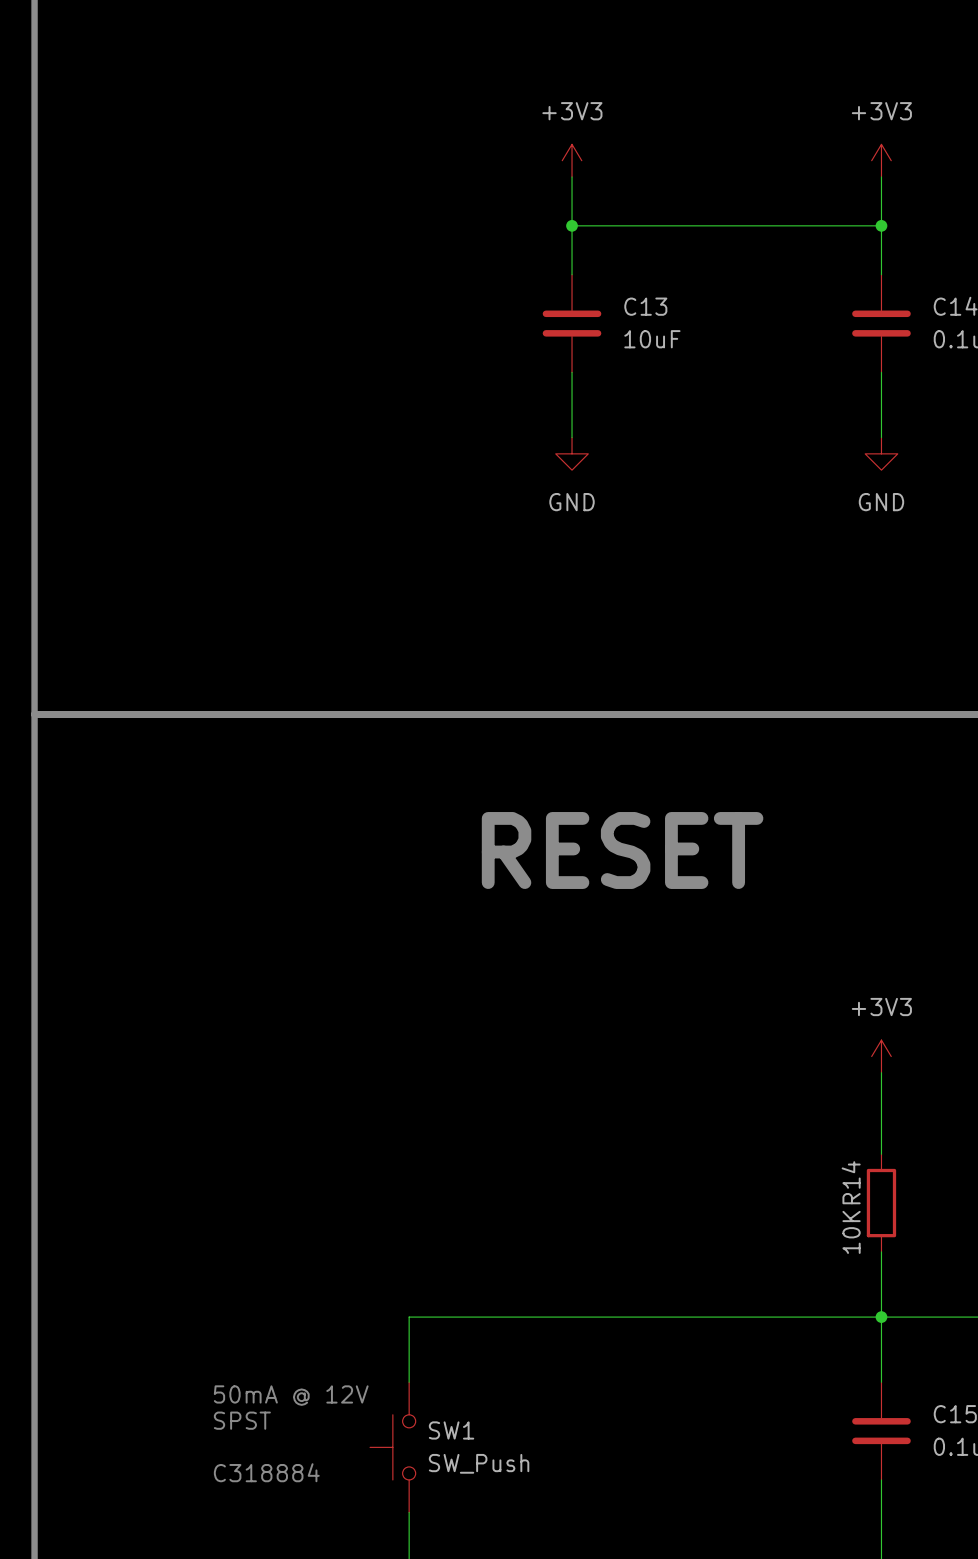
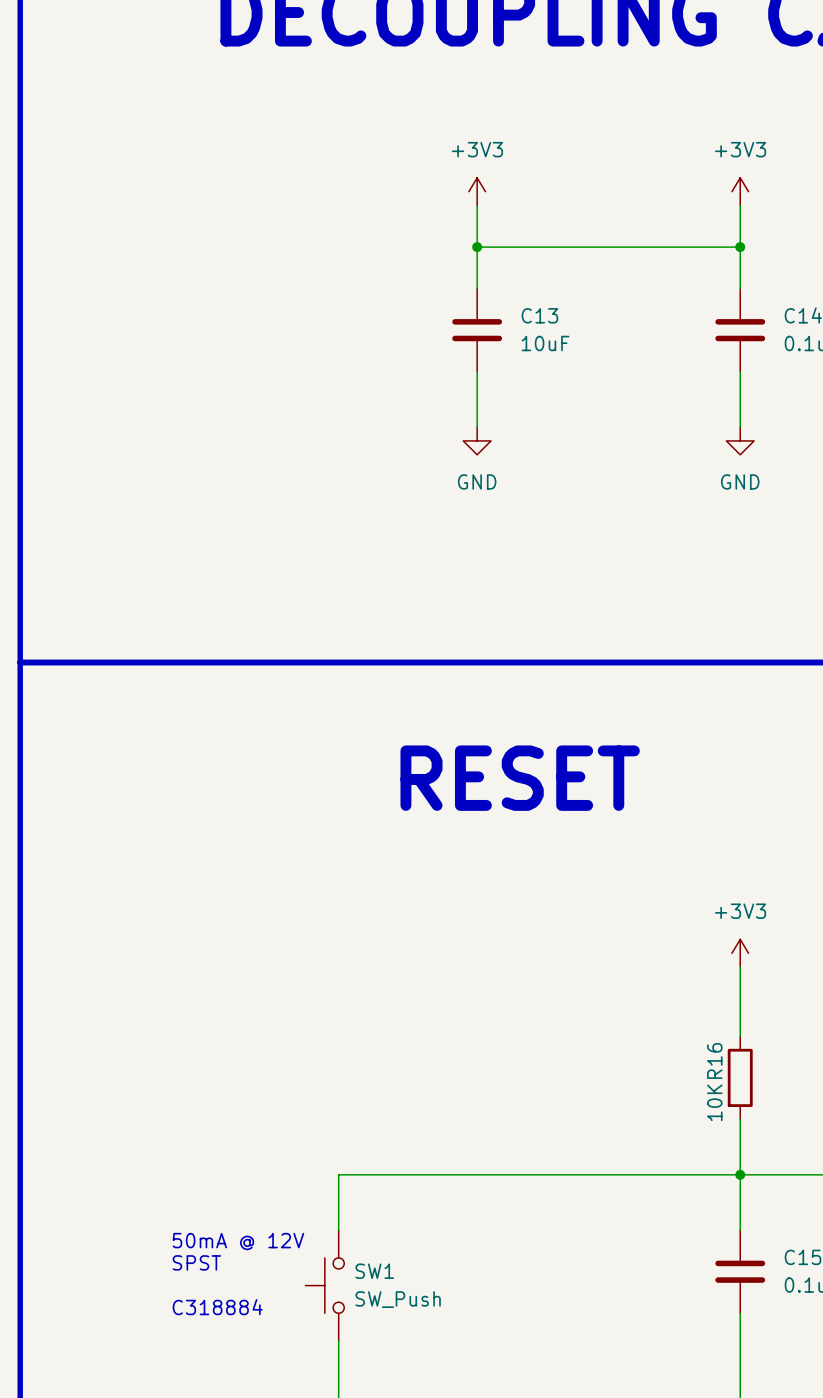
R14 name: R14 (851, 1182) -> R16 (714, 1060)

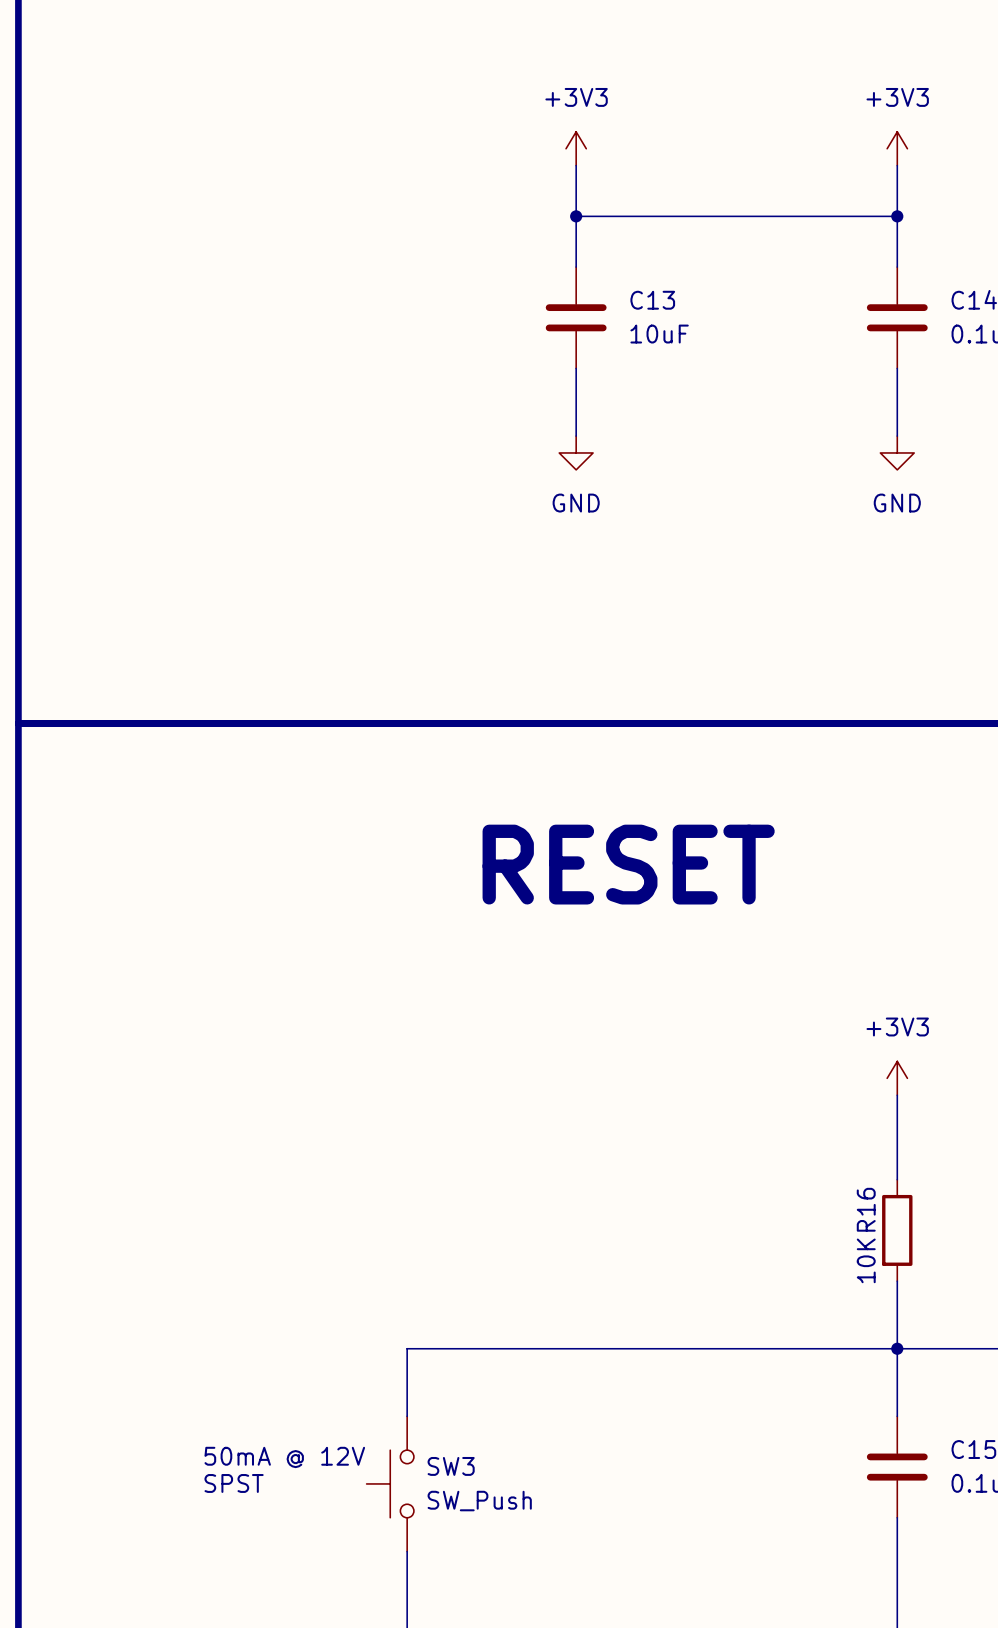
text: 50mA @ 12V (238, 1241) -> none
text: SPST (196, 1262) -> 50mA @ 12V (284, 1457)
SW1 name: SW1 (374, 1271) -> SW3 (451, 1466)
text: none -> SPST (234, 1483)
text: C318884 (217, 1307) -> none

